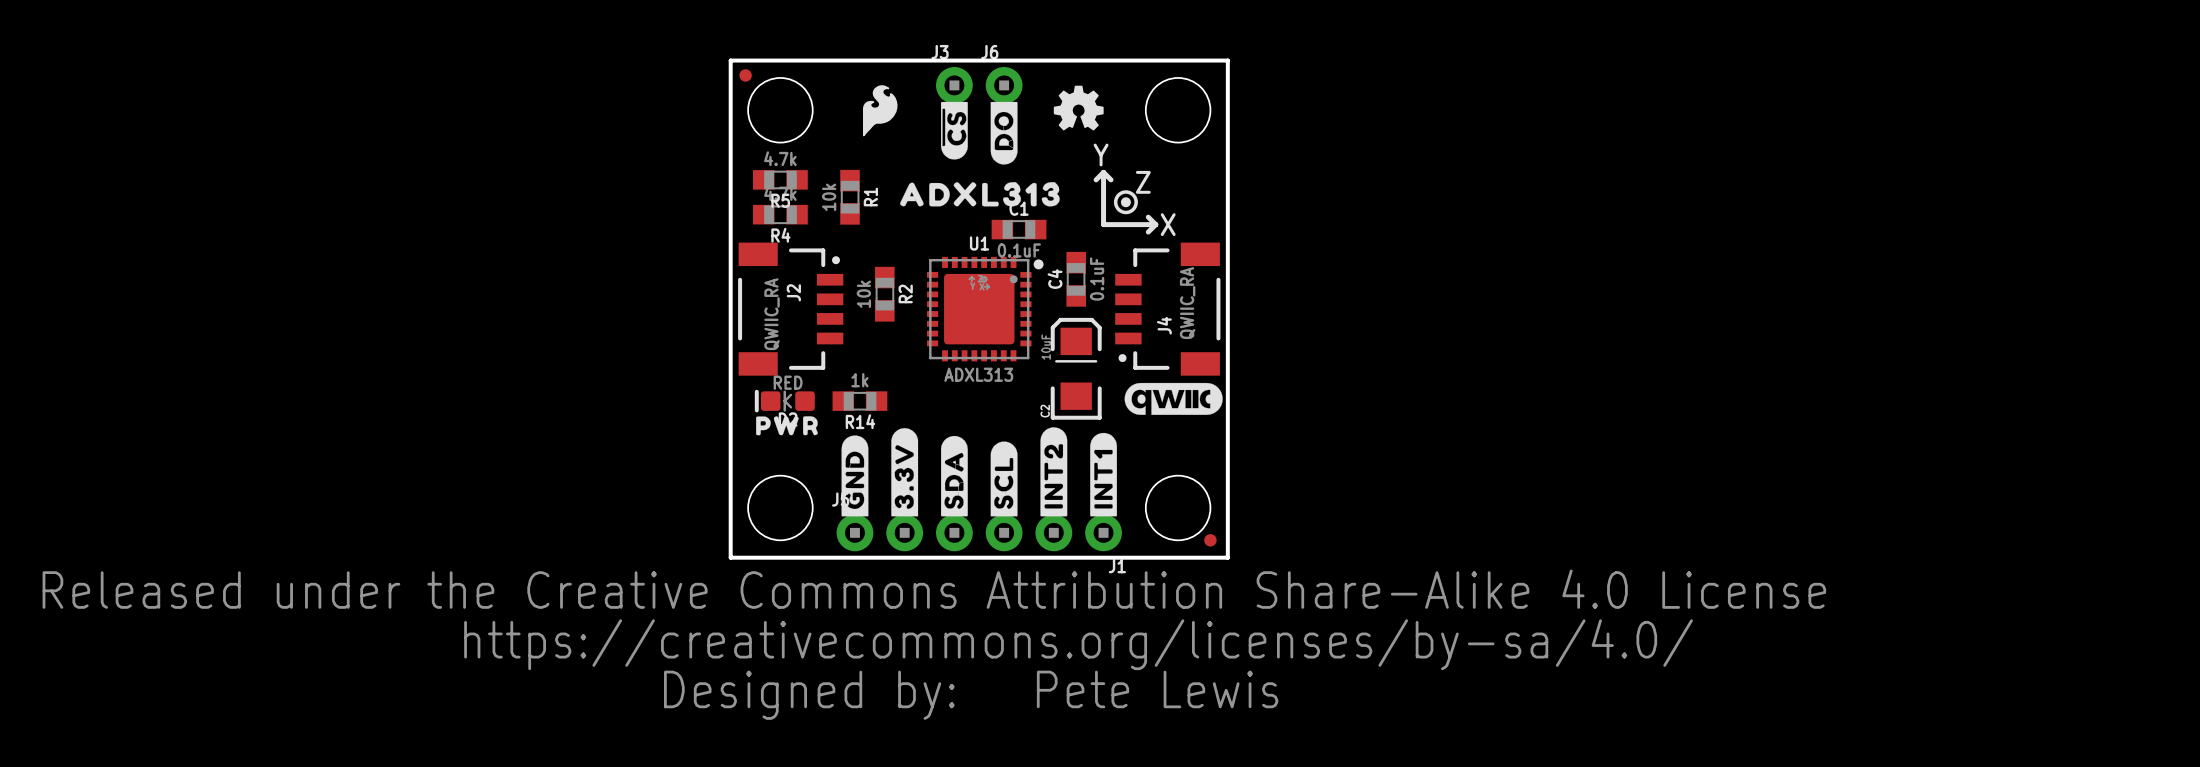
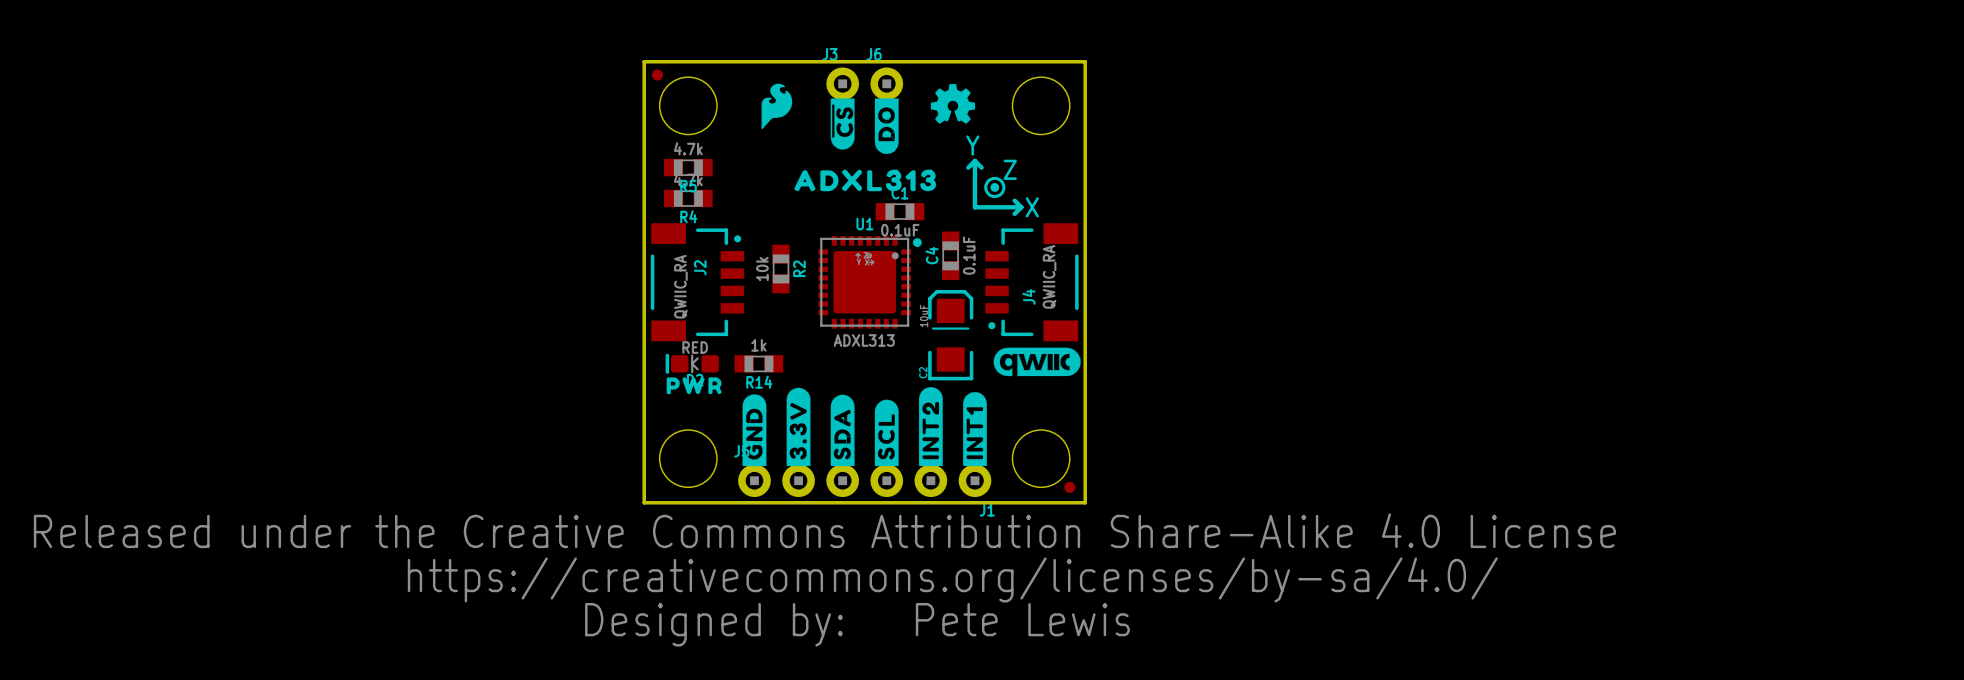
R1: 10k (850, 197) -> none

